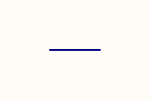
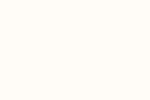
wire: (49, 49) (99, 49) -> none

